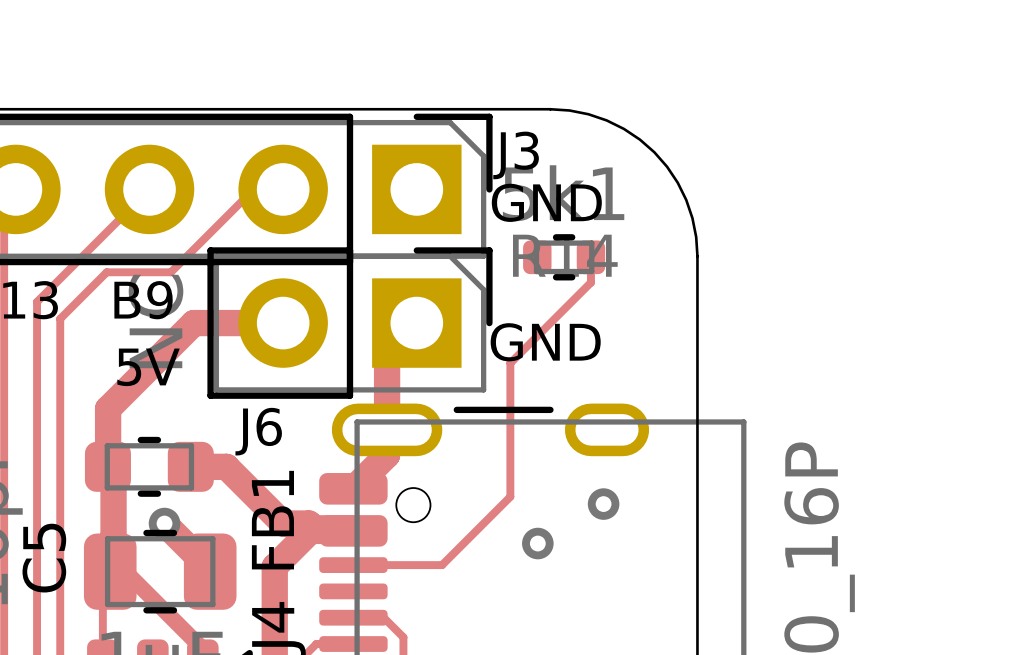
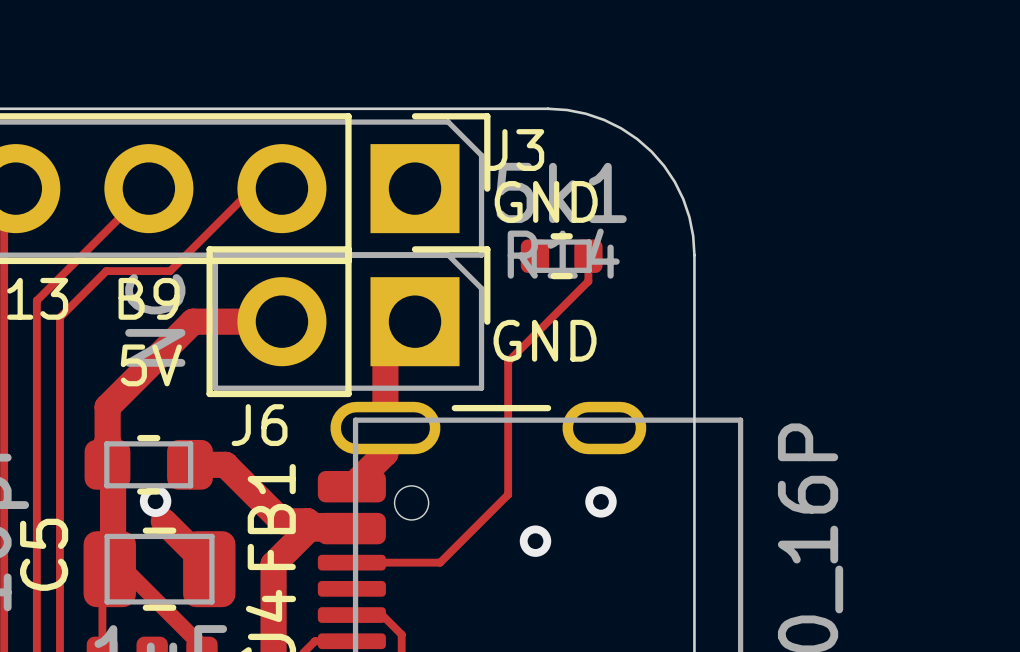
via position: (164, 523) -> (155, 501)

